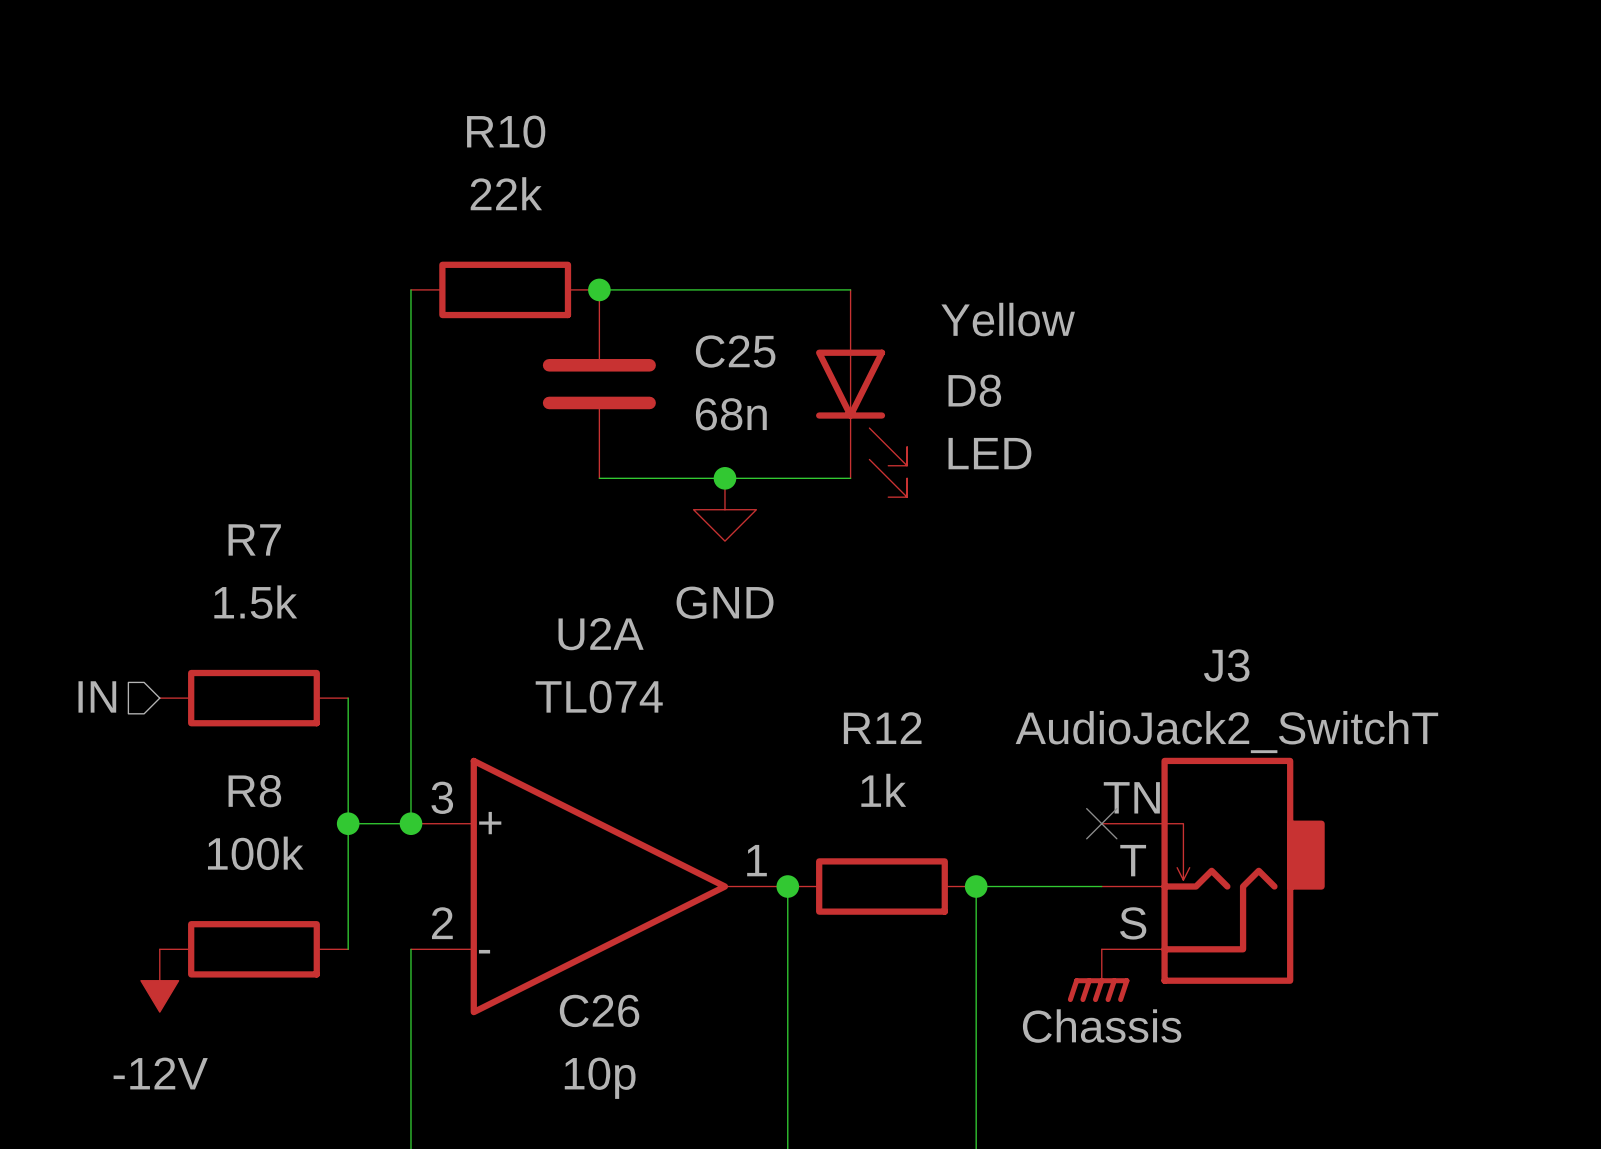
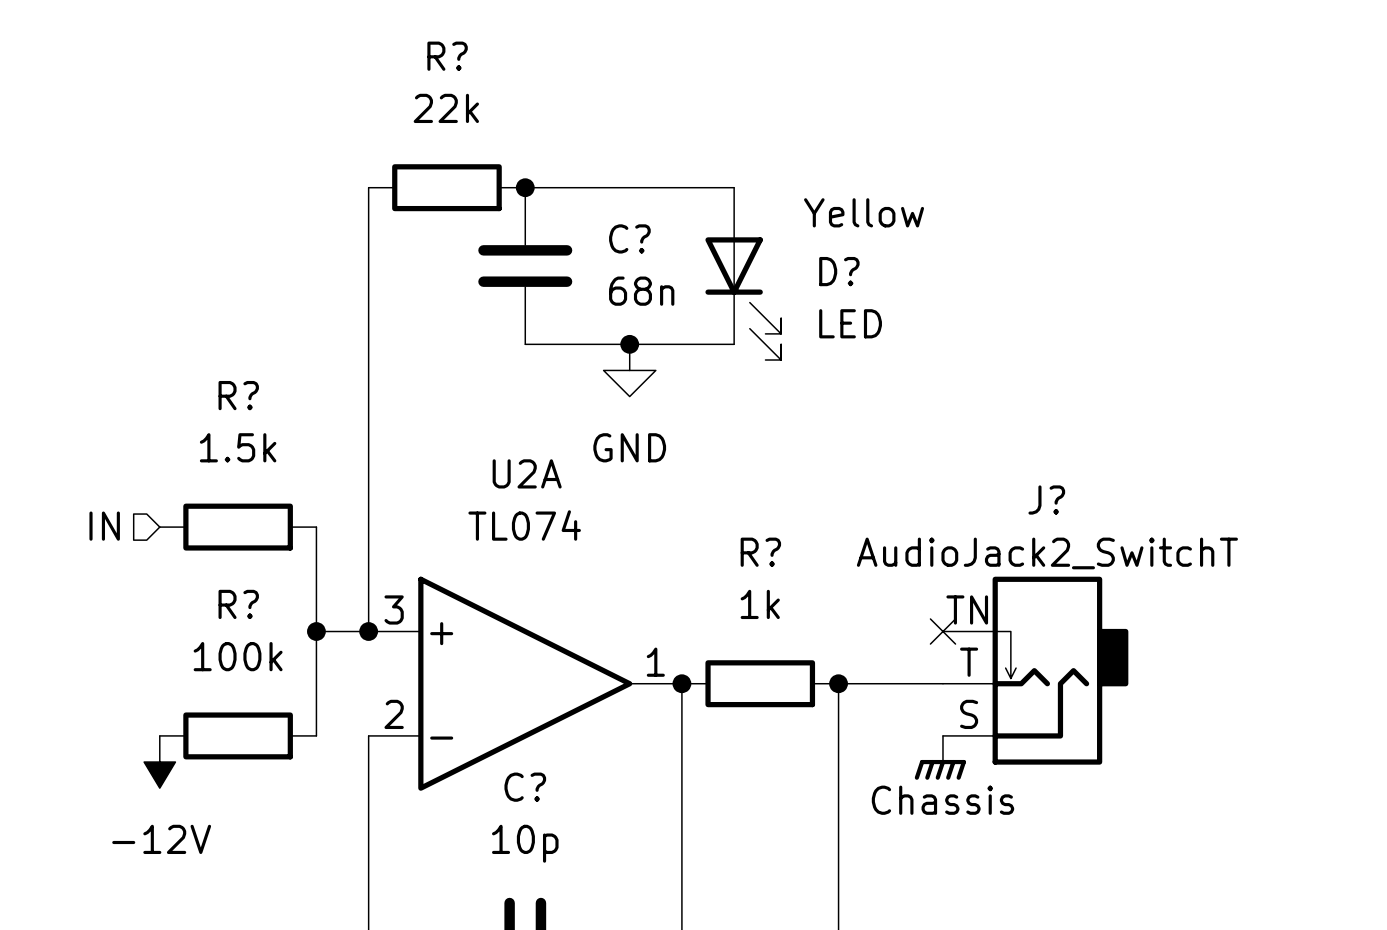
R10 name: R10 (506, 131) -> R? (447, 56)
C25 name: C25 (735, 351) -> C? (629, 238)
D8 name: D8 (974, 390) -> D? (839, 271)
R7 name: R7 (254, 539) -> R? (238, 395)
J3 name: J3 (1226, 665) -> J? (1046, 500)
R12 name: R12 (882, 728) -> R? (760, 552)
R8 name: R8 (254, 791) -> R? (238, 604)
C26 name: C26 (599, 1010) -> C? (525, 787)

